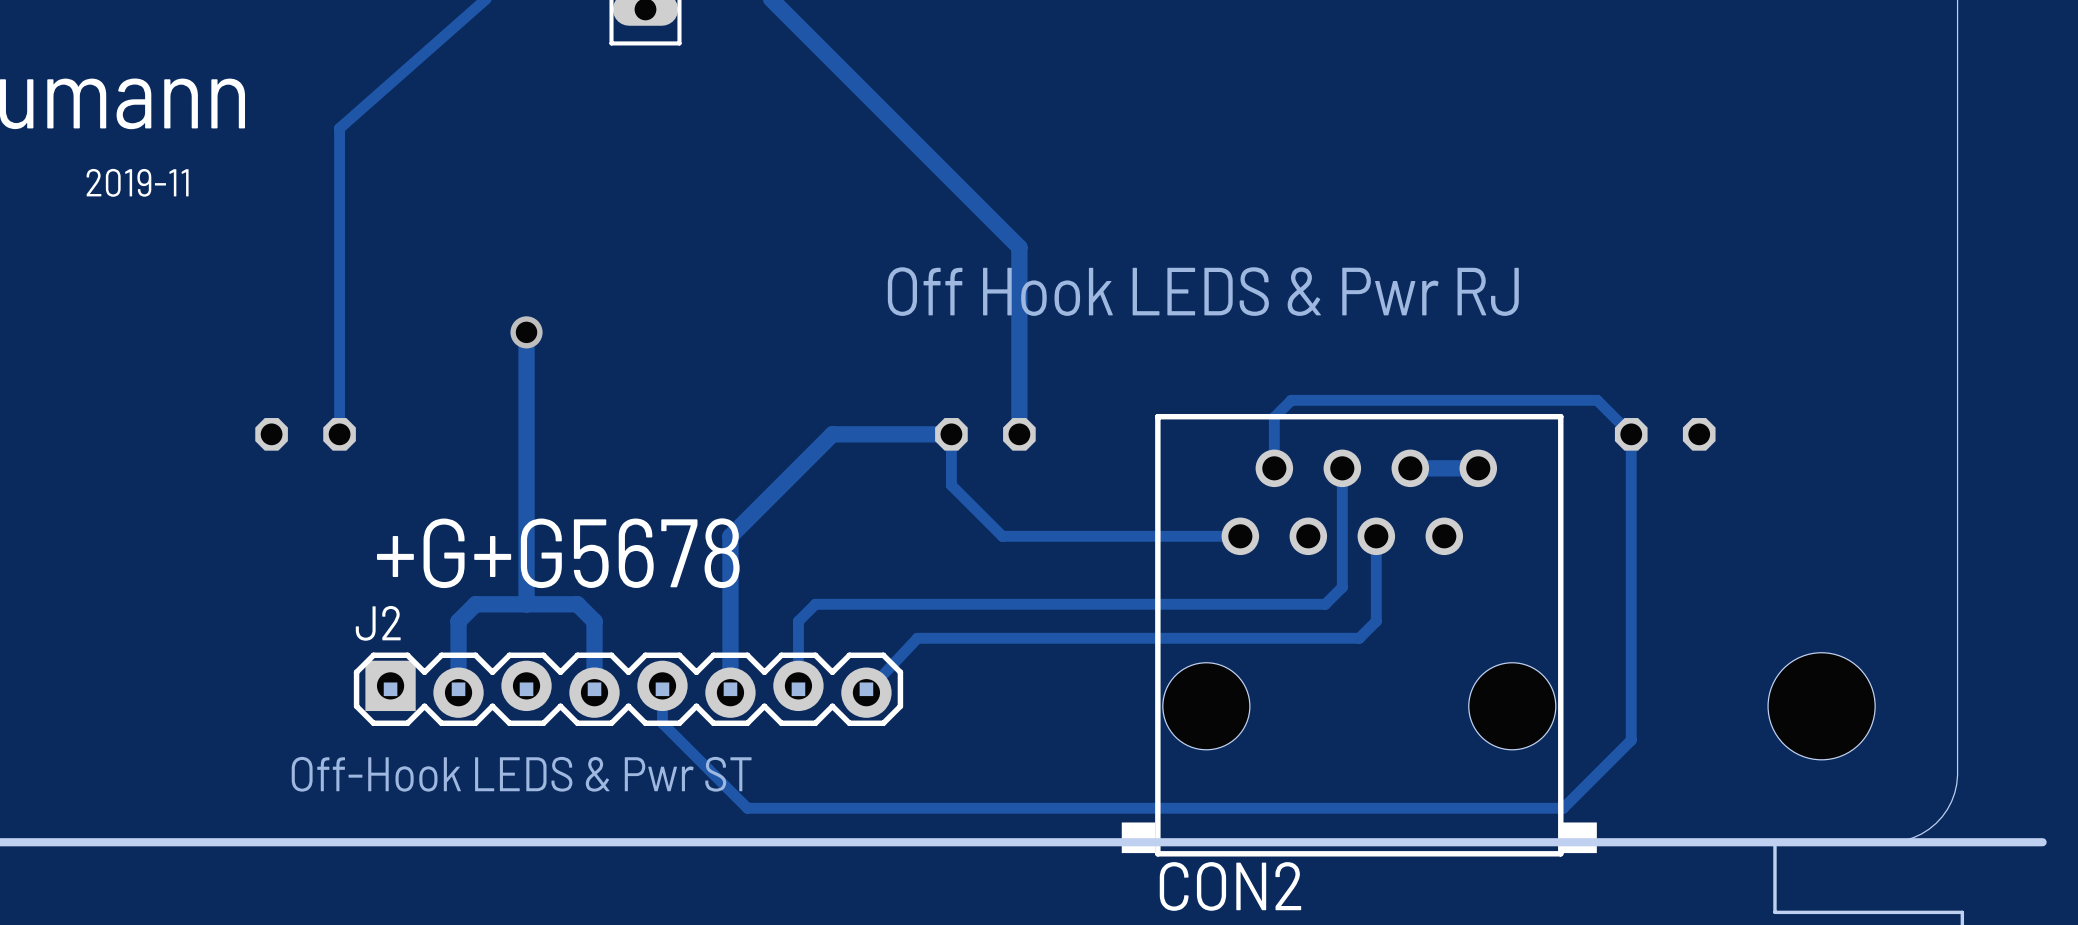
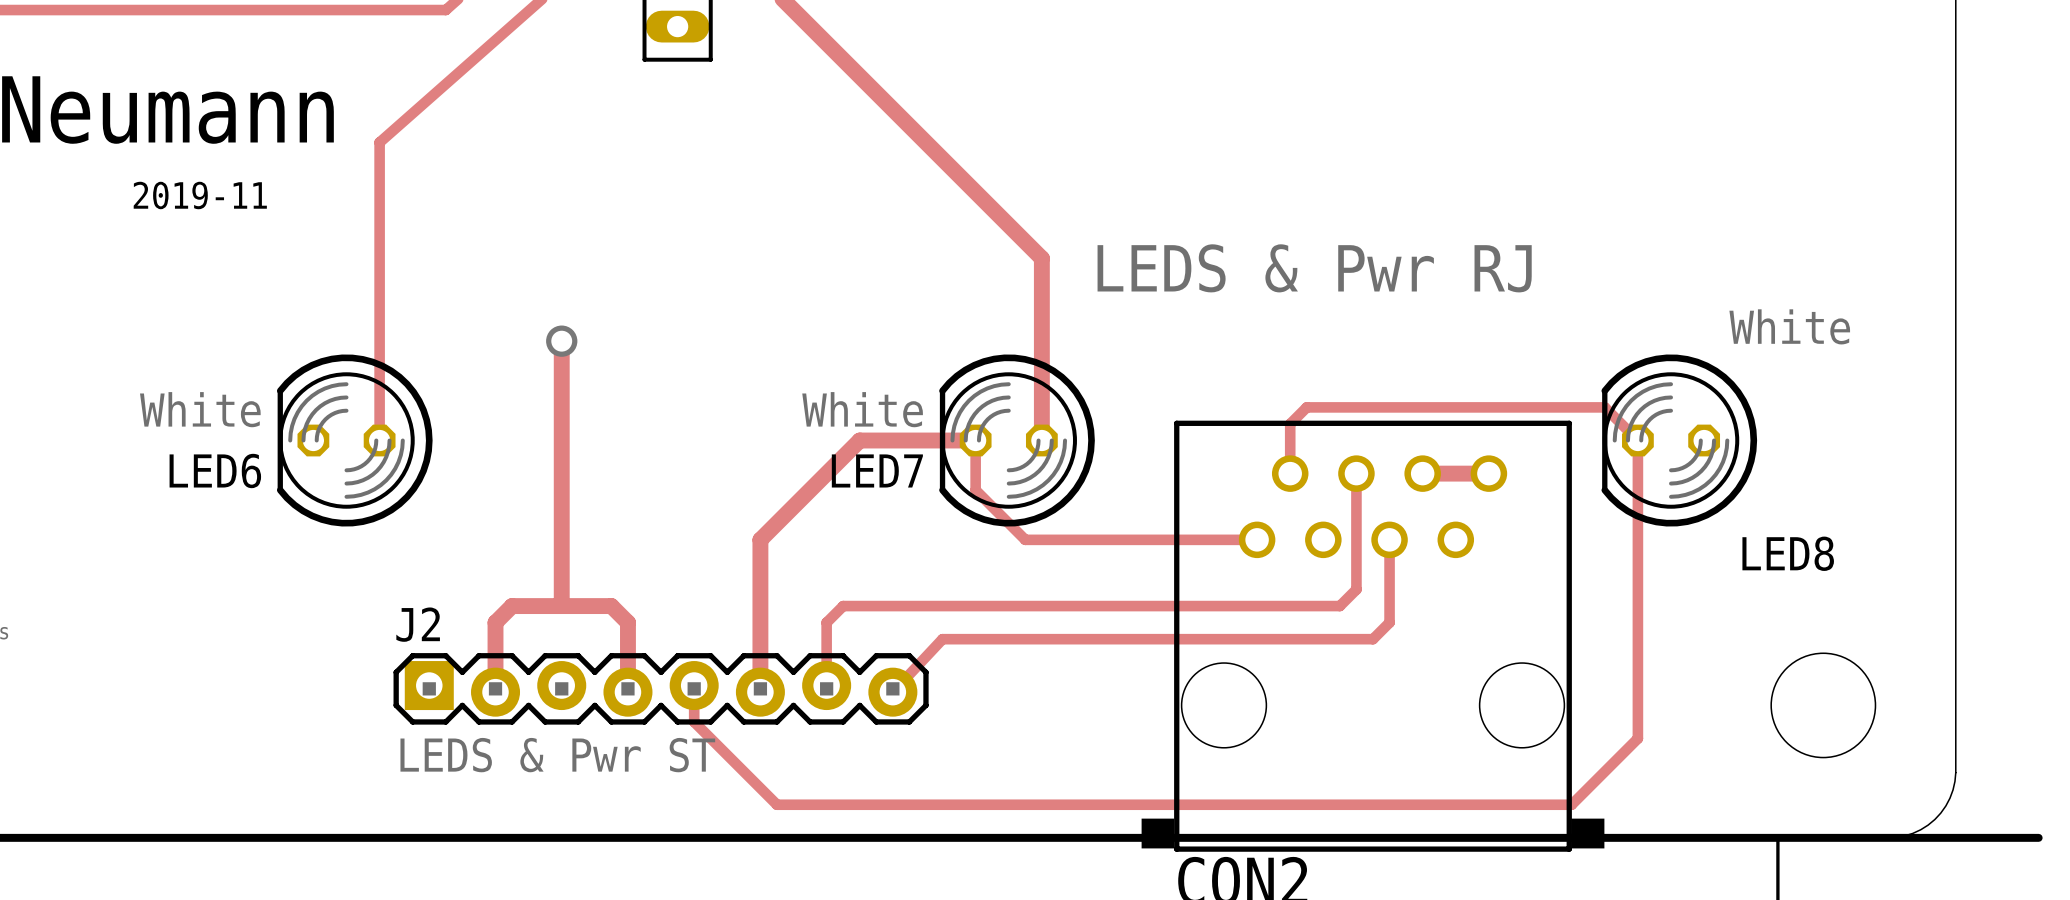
CON2 value: Off Hook LEDS & Pwr RJ (1203, 291) -> LEDS & Pwr RJ (1314, 268)
LED6 side: bottom (305, 434) -> top (354, 440)
LED7 side: bottom (985, 434) -> top (1017, 440)
LED8 side: bottom (1665, 434) -> top (1679, 440)
text: +G+G5678 (558, 553) -> none
J2 value: Off-Hook LEDS & Pwr ST (521, 774) -> LEDS & Pwr ST (557, 755)

